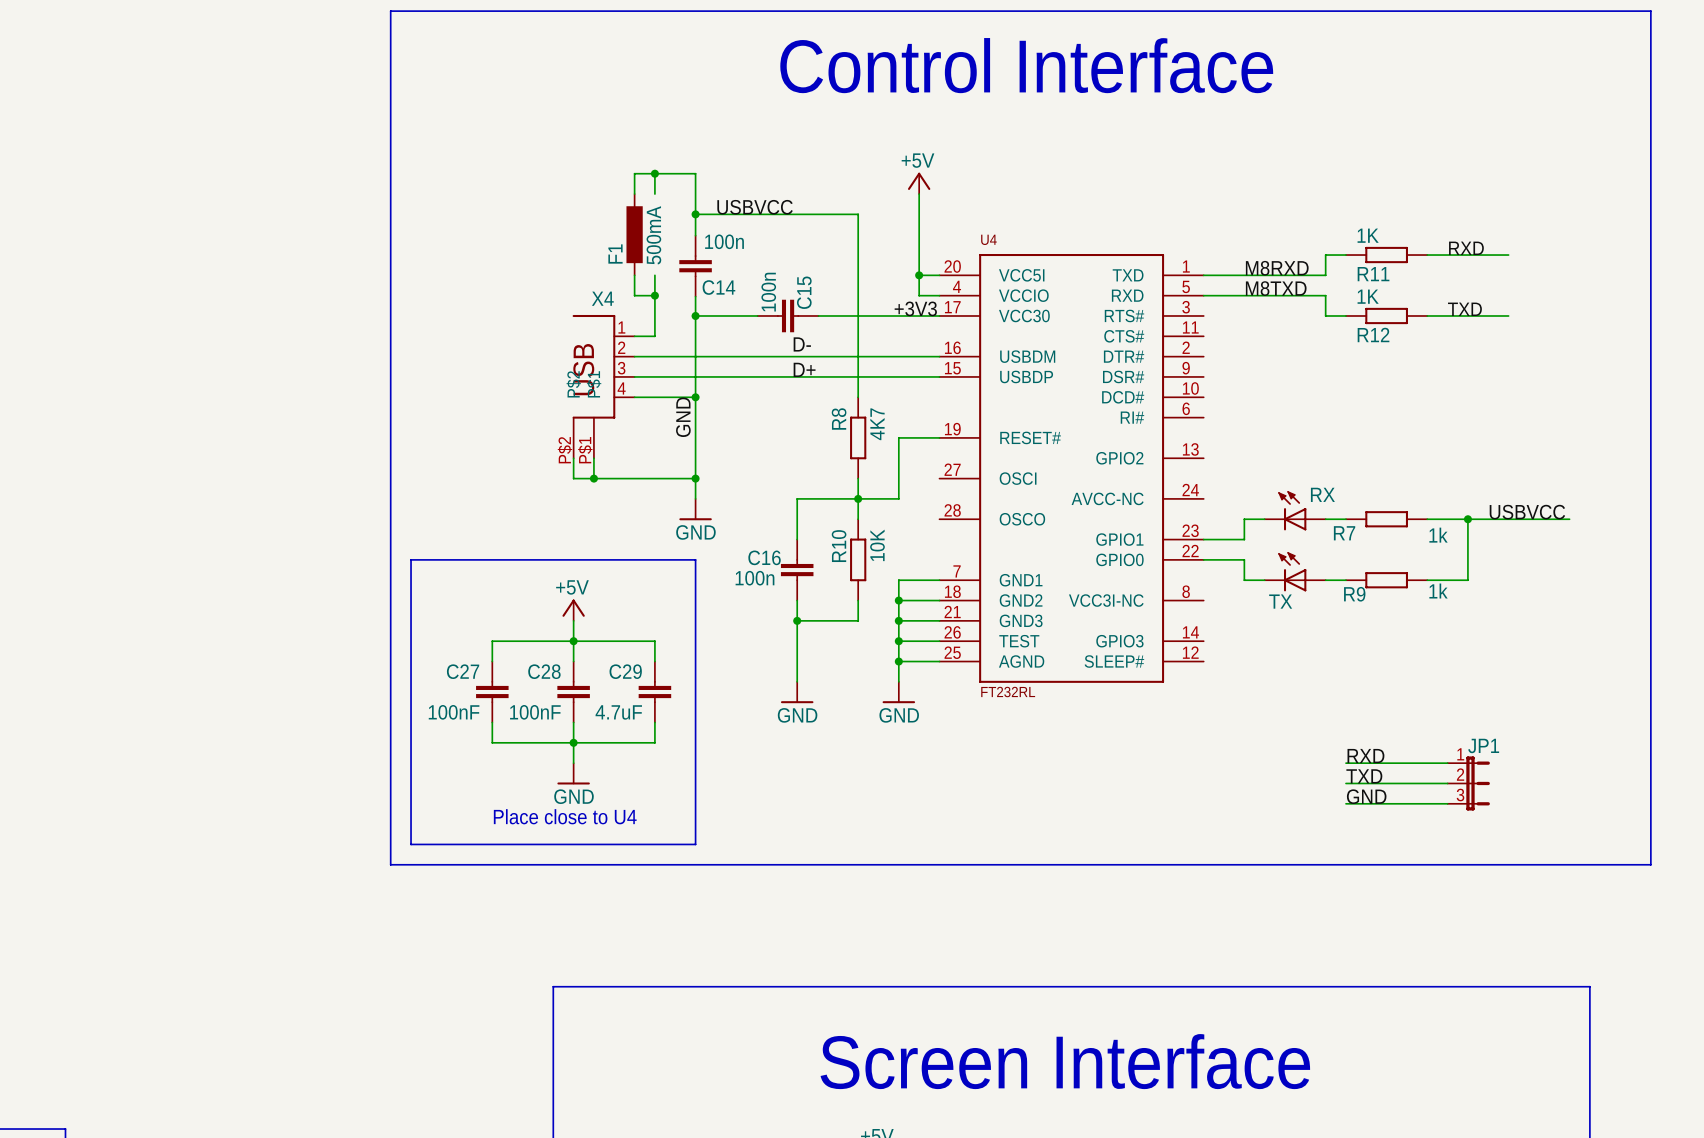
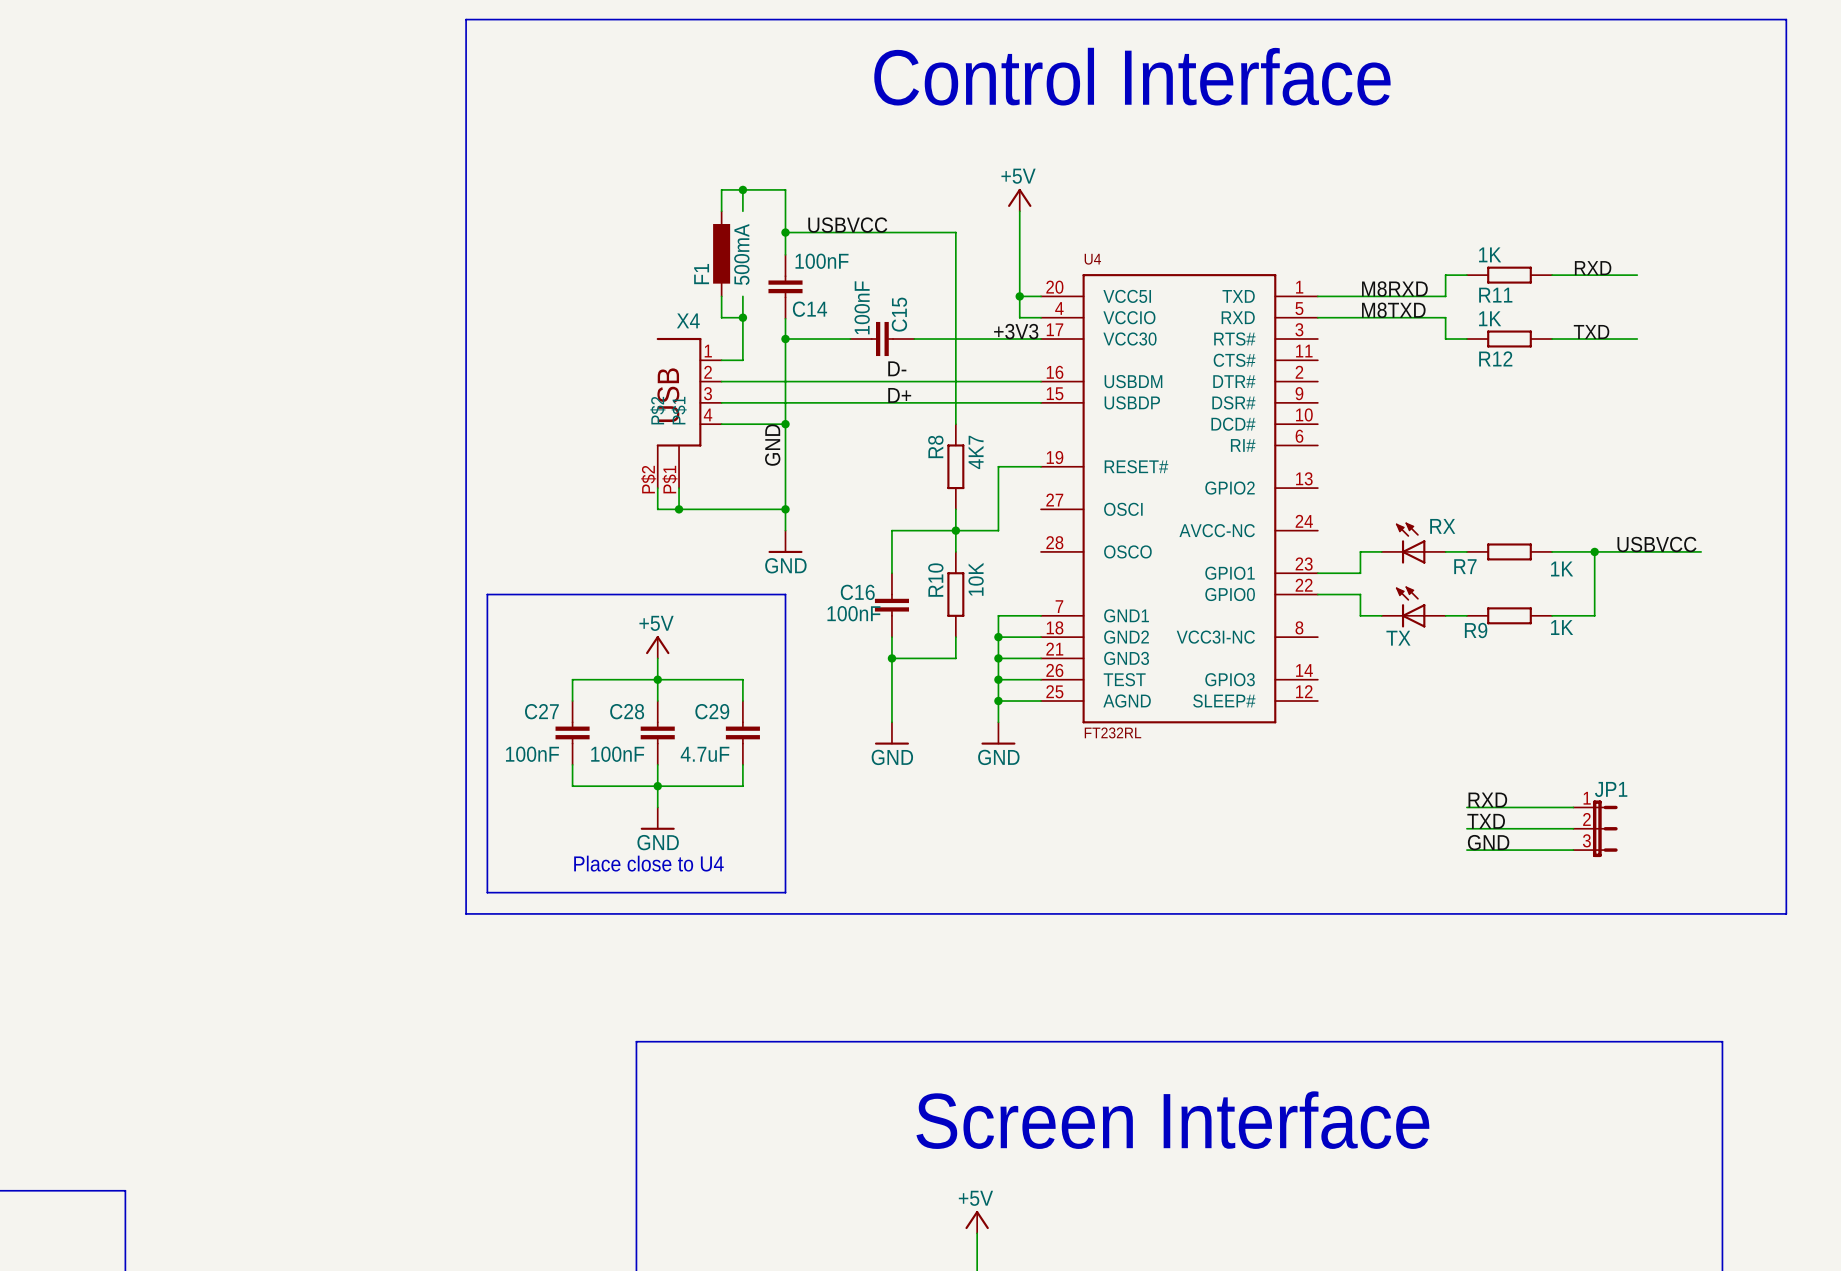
C14 value: 100n (724, 241) -> 100nF (822, 261)
C15 value: 100n (768, 292) -> 100nF (862, 307)
R7 value: 1k (1438, 535) -> 1K (1562, 568)
C16 value: 100n (755, 578) -> 100nF (853, 613)
R9 value: 1k (1438, 591) -> 1K (1562, 627)

